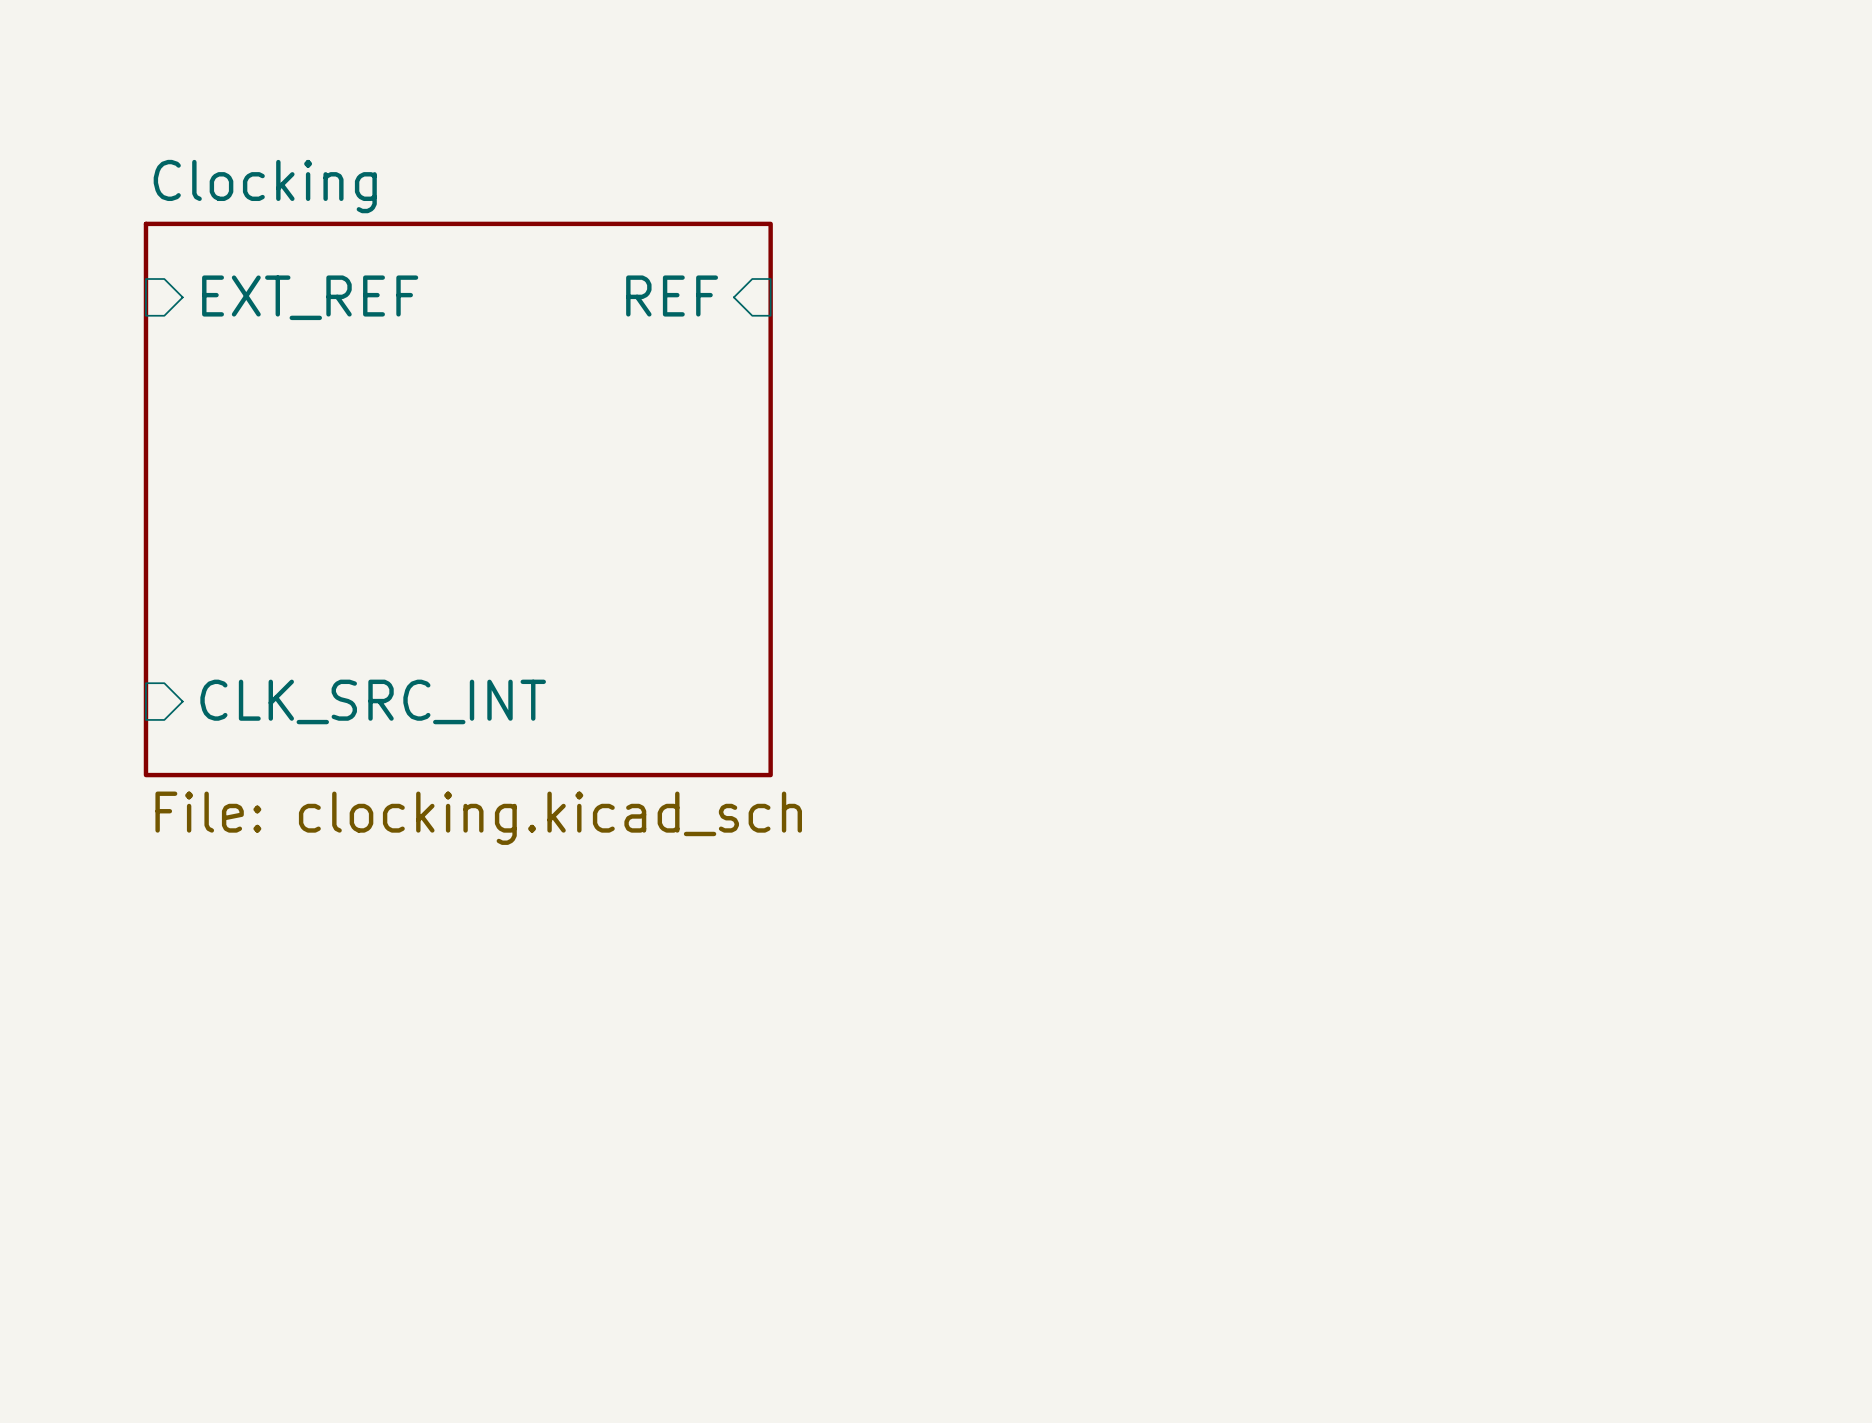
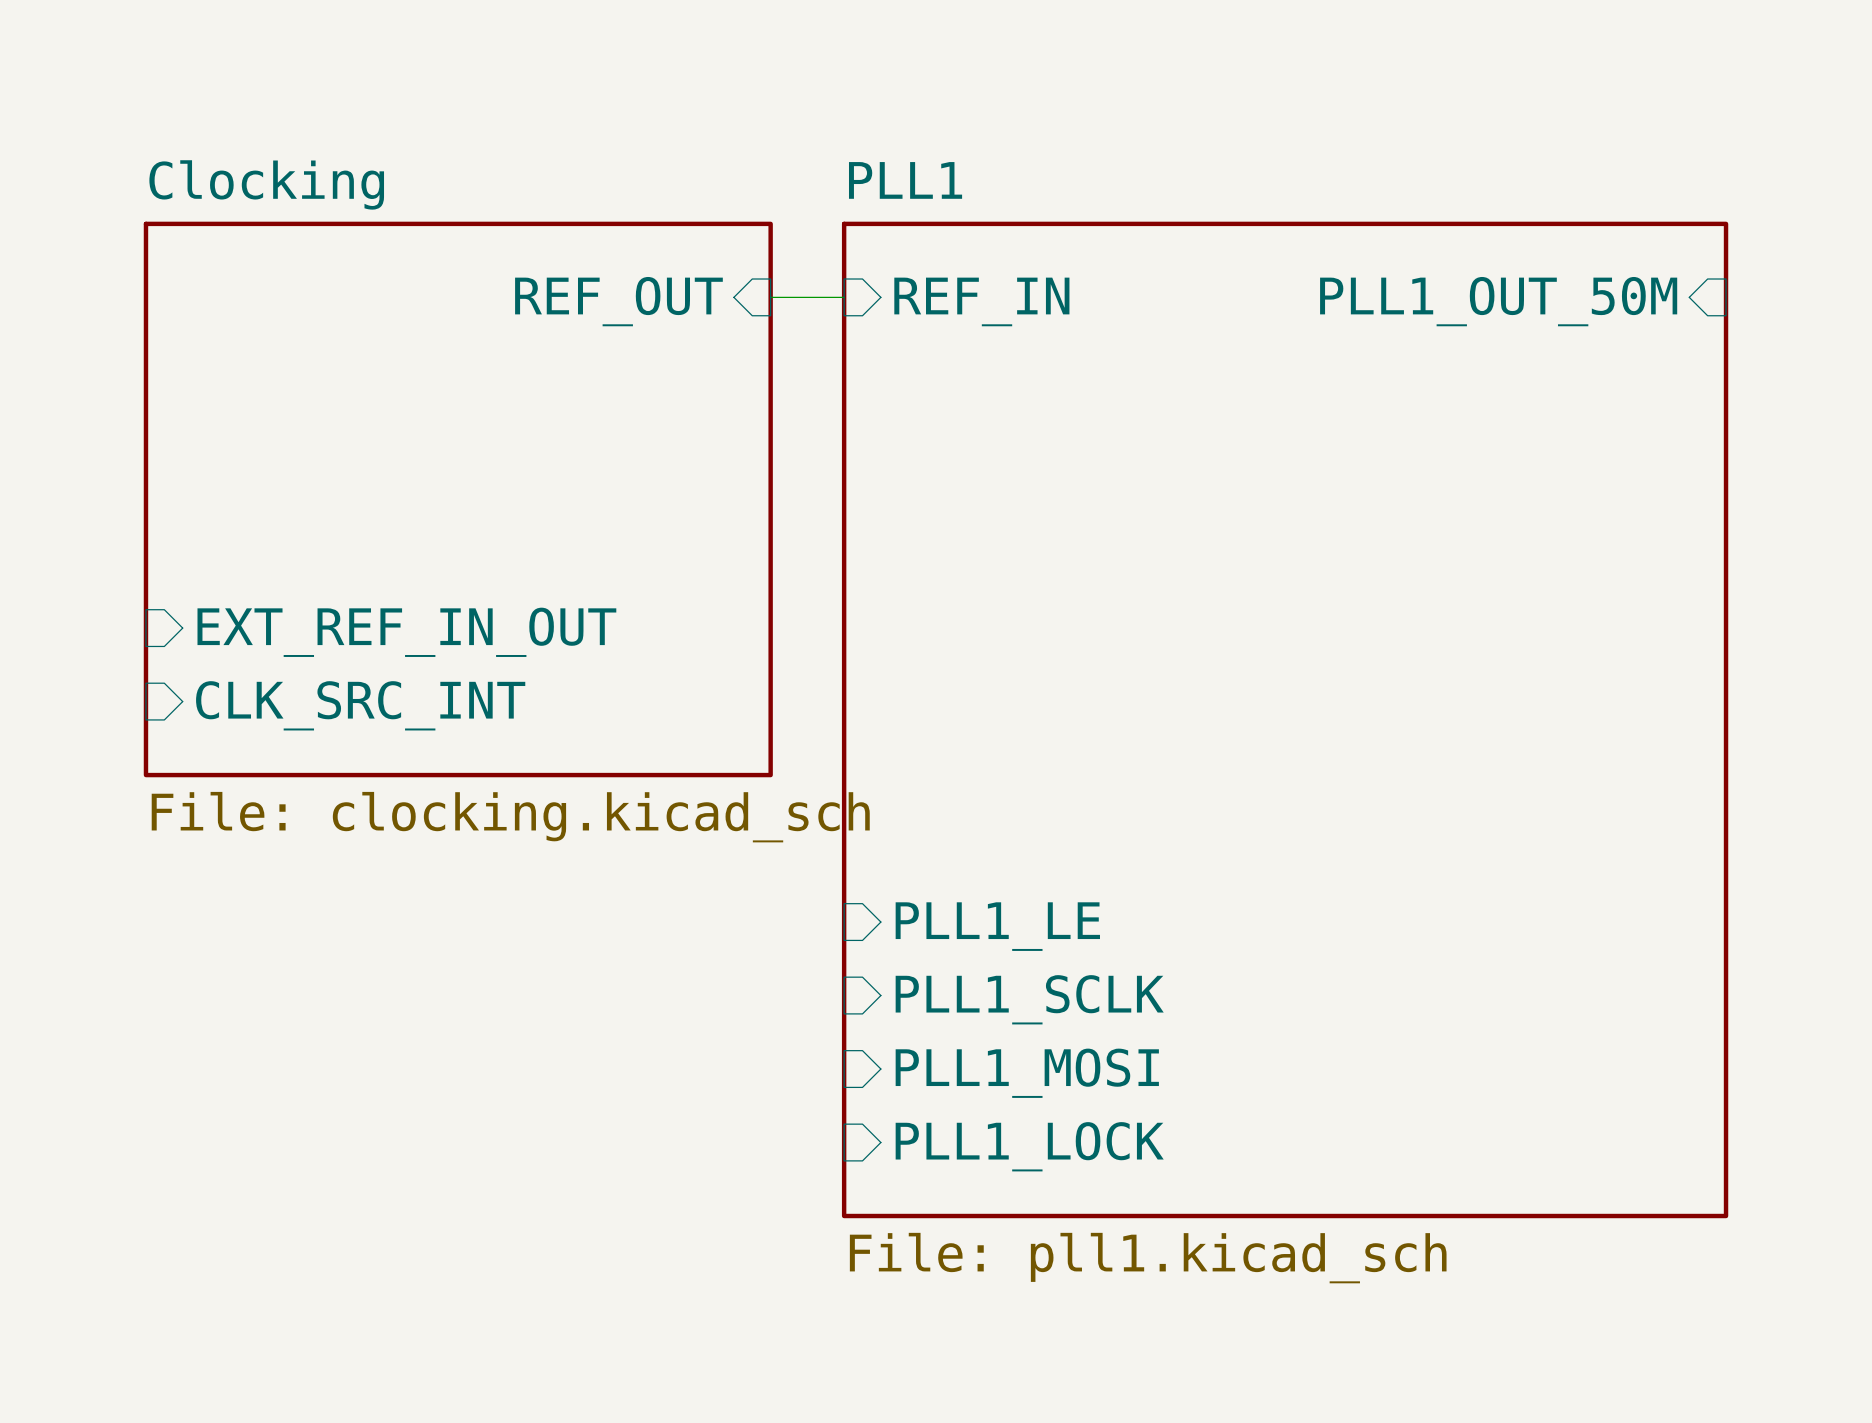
sheet pin: REF (672, 296) -> REF_OUT (618, 301)
sheet pin: EXT_REF (310, 297) -> none
wire: none -> (770, 297) (844, 297)
sheet pin: none -> REF_IN (981, 301)
sheet pin: none -> PLL1_OUT_50M (1498, 301)
sheet pin: none -> EXT_REF_IN_OUT (406, 632)
sheet PLL1: none -> File: pll1.kicad_sch (1285, 719)
sheet pin: none -> PLL1_LE (997, 926)
sheet pin: none -> PLL1_SCLK (1029, 999)
sheet pin: none -> PLL1_MOSI (1027, 1073)
sheet pin: none -> PLL1_LOCK (1029, 1146)

